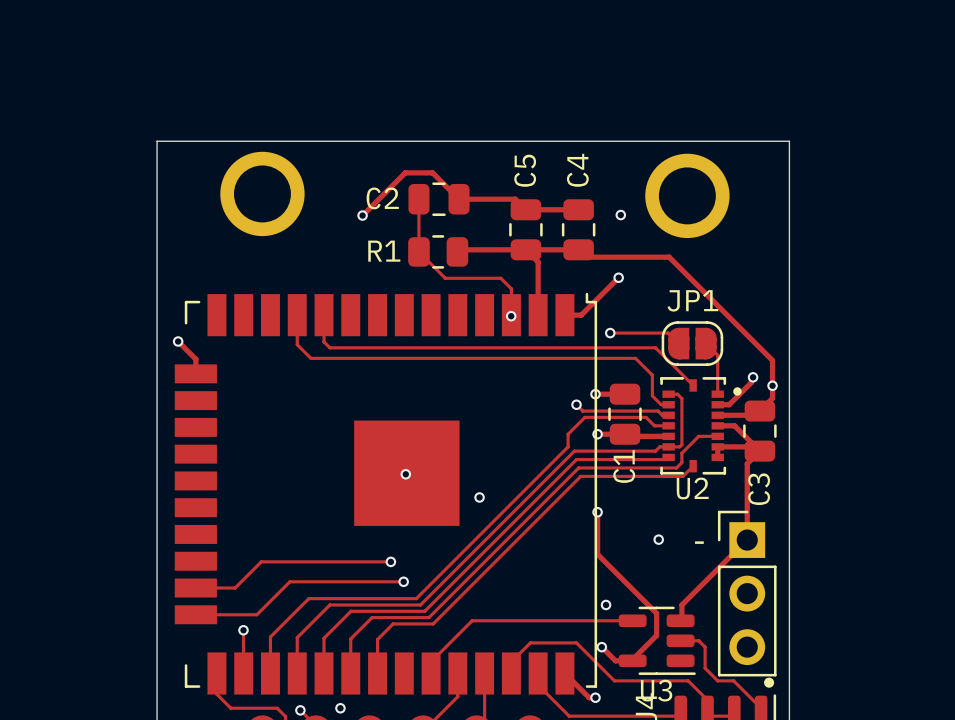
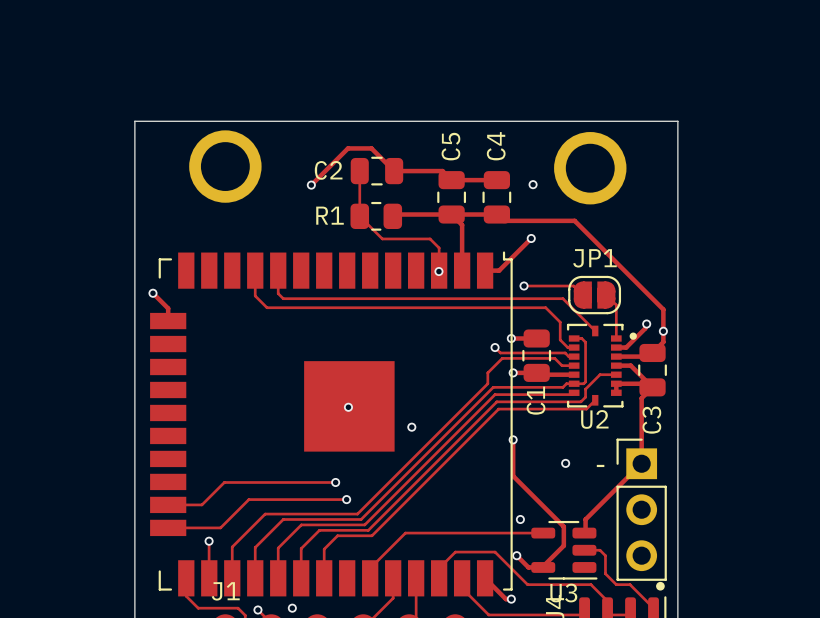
J1 name: none -> J1 (225, 591)

